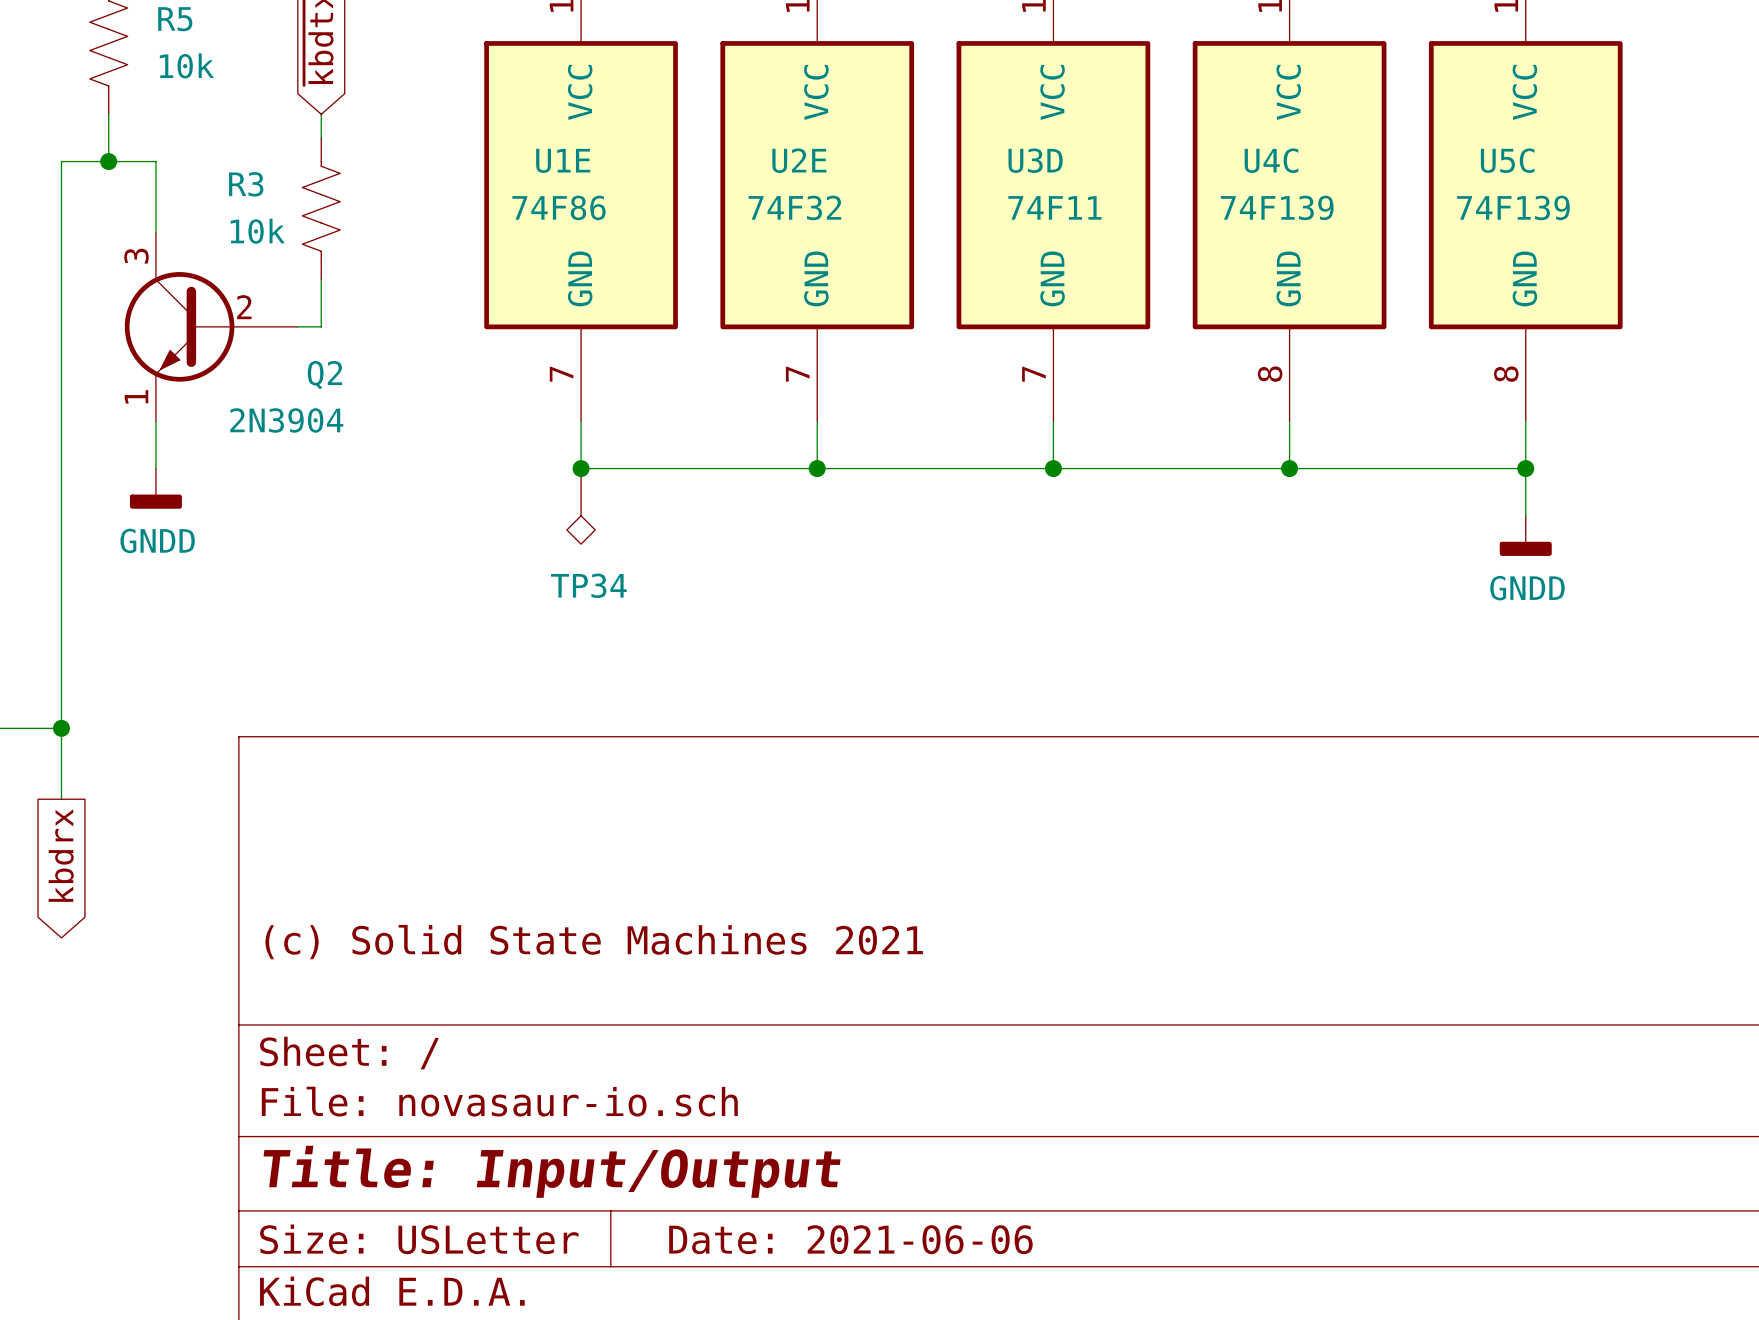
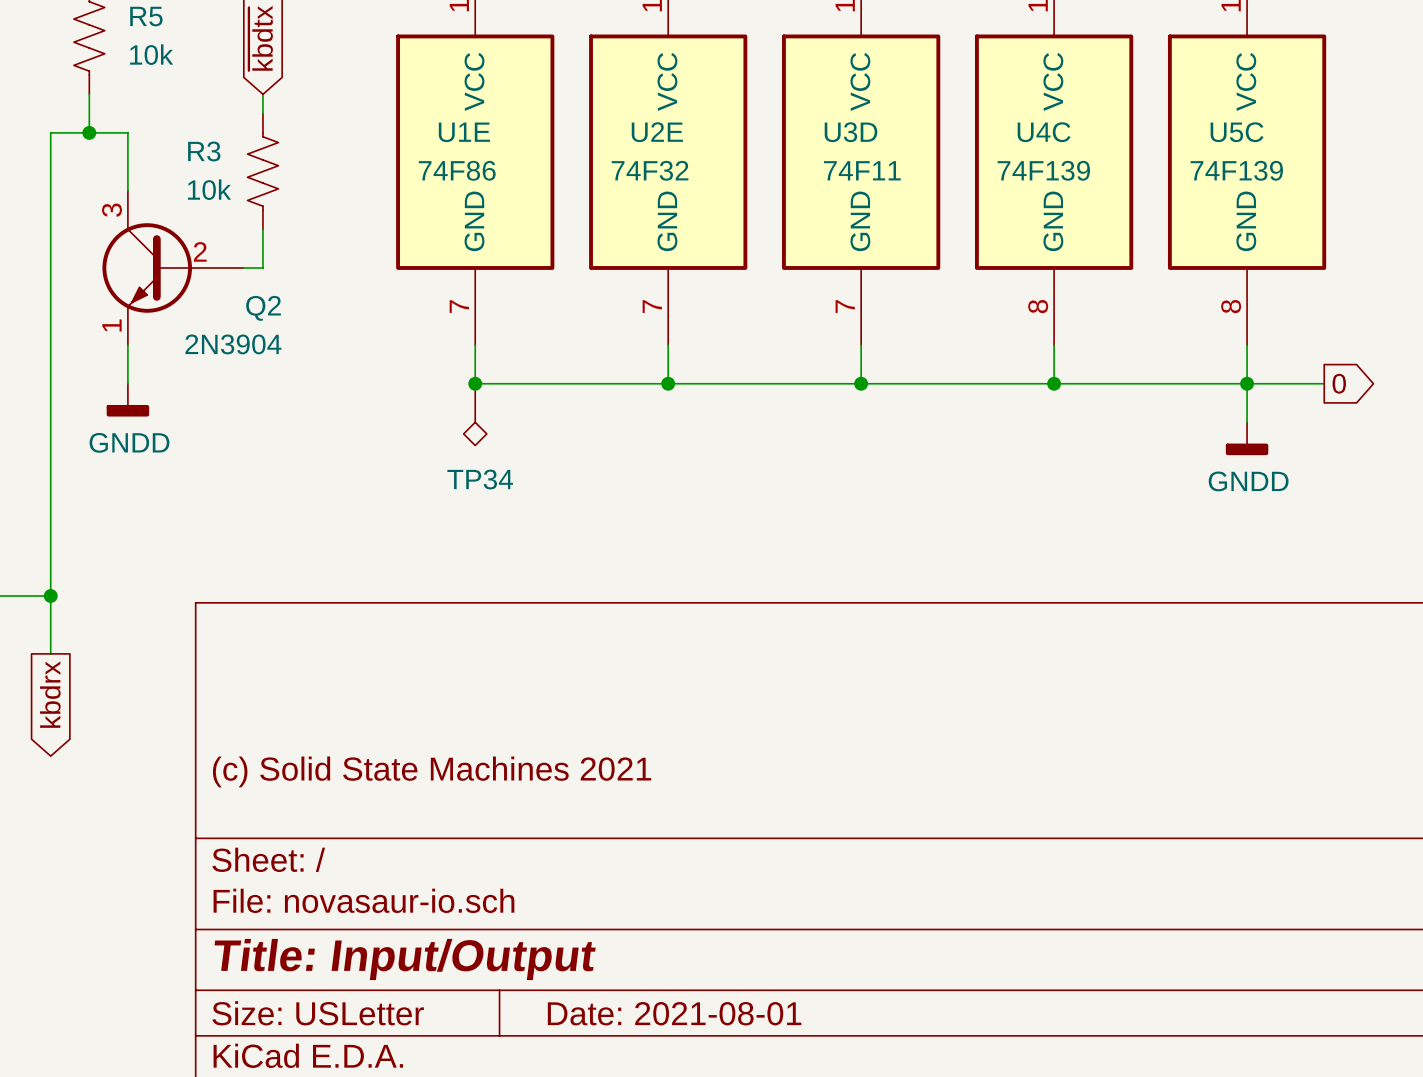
wire: none -> (1247, 383) (1324, 383)
global label: none -> 0 (1339, 383)
title block: Date: 2021-06-06 (850, 1239) -> Date: 2021-08-01 (674, 1013)

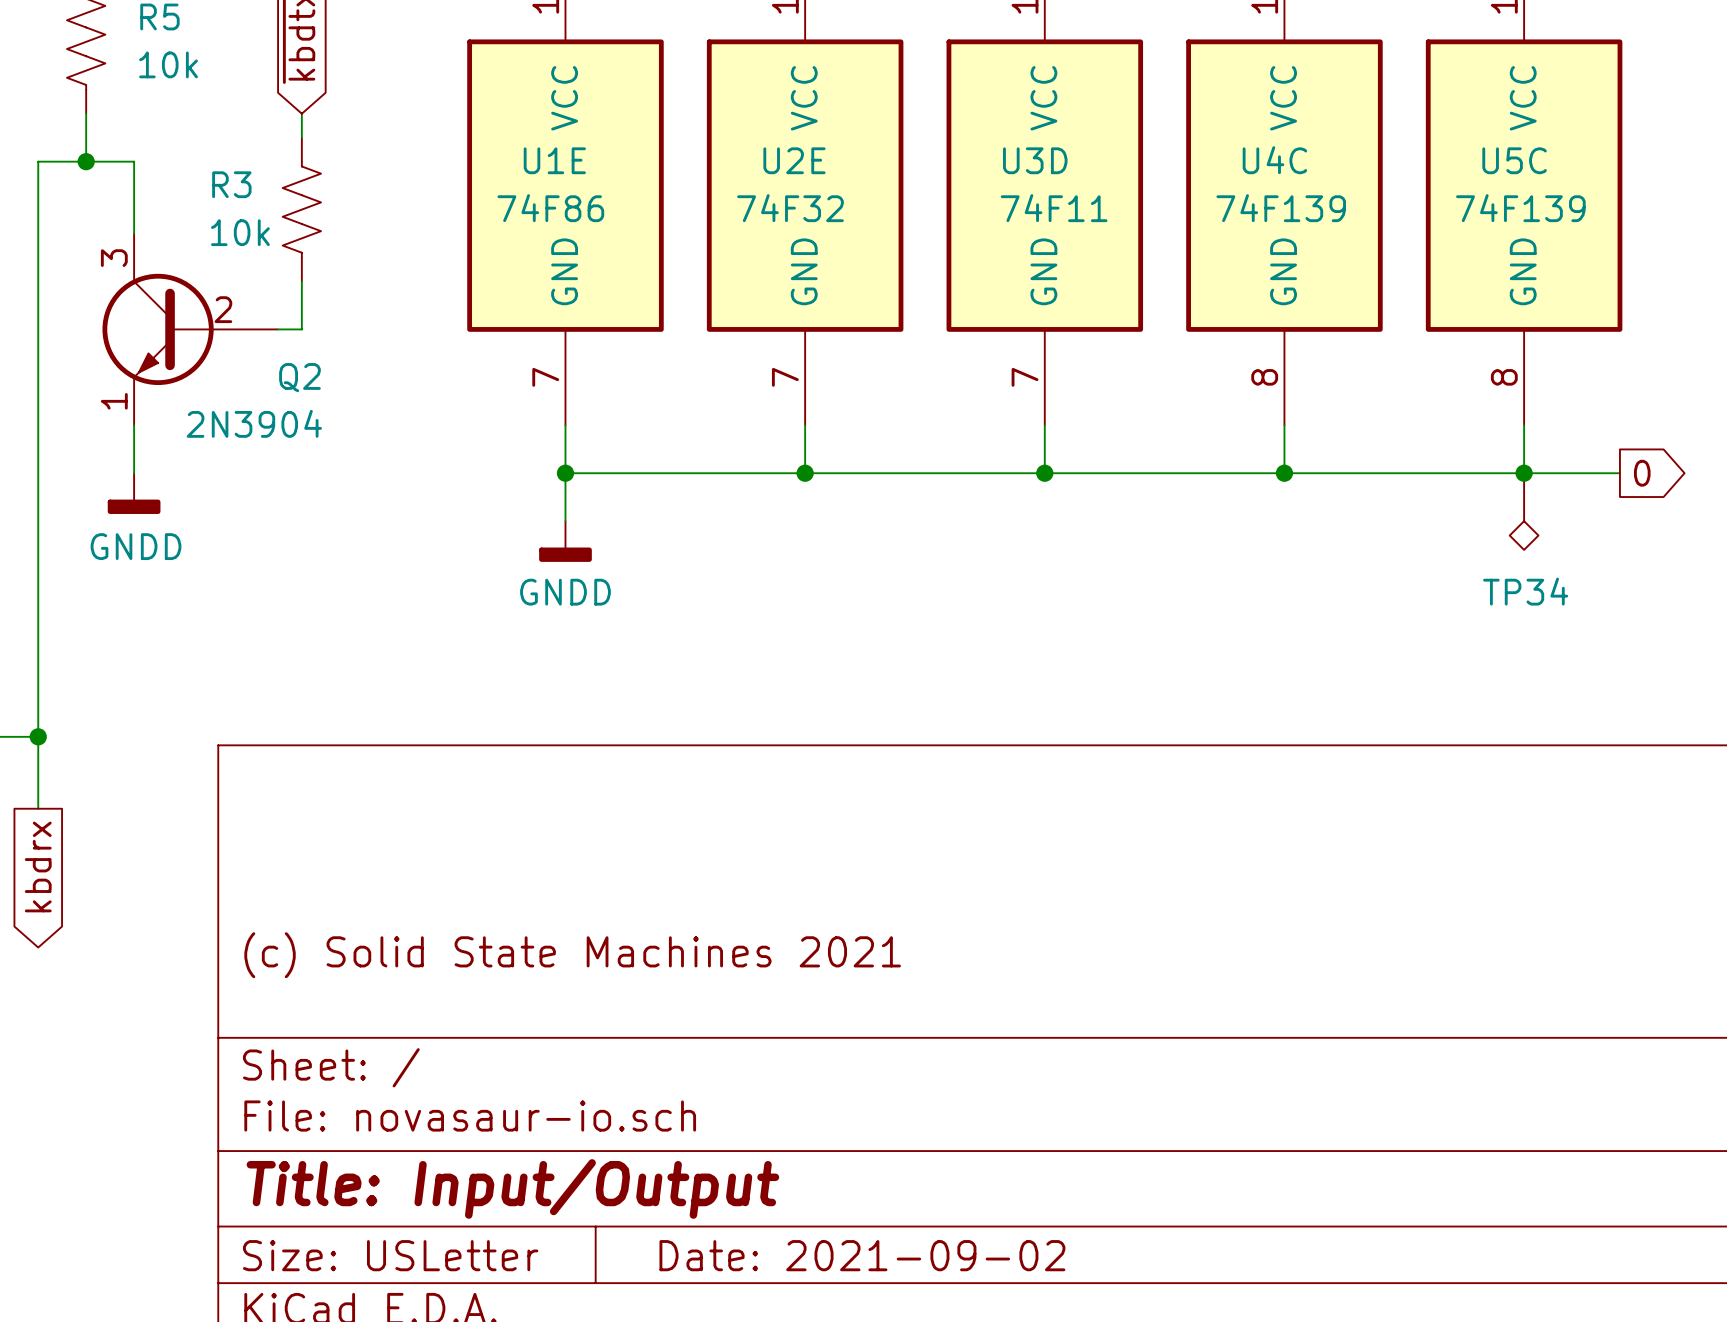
TP34 position: (475, 414) -> (1524, 511)
power symbol: none -> GNDD (565, 541)
power symbol: GNDD (1247, 438) -> none
title block: Date: 2021-08-01 (674, 1013) -> Date: 2021-09-02 (862, 1255)

